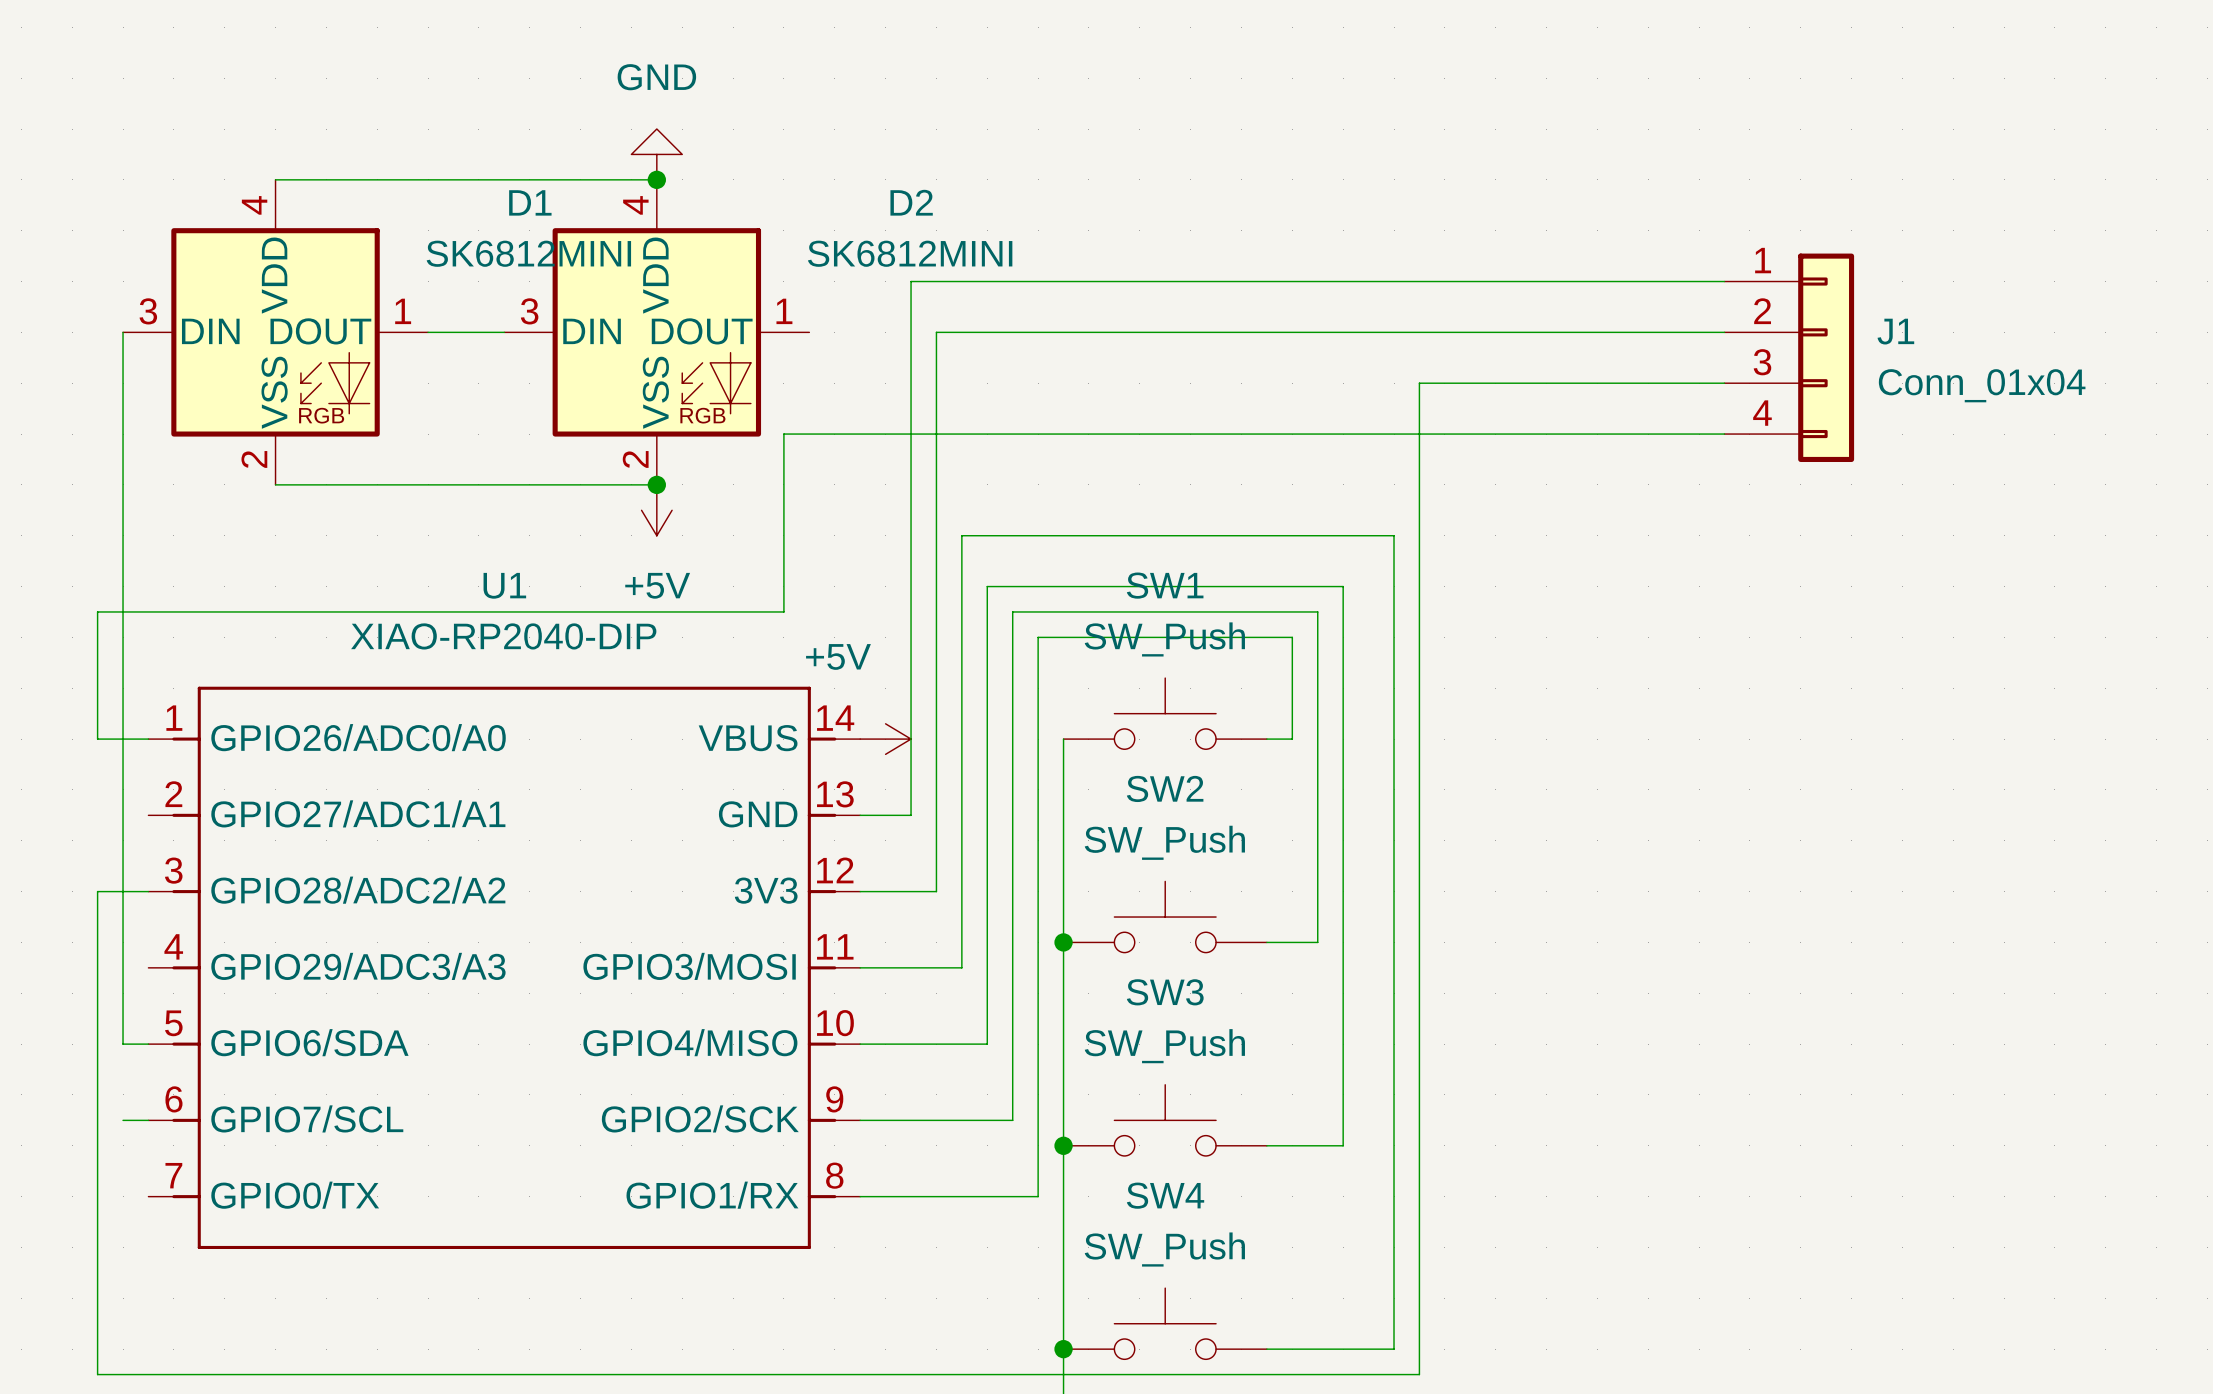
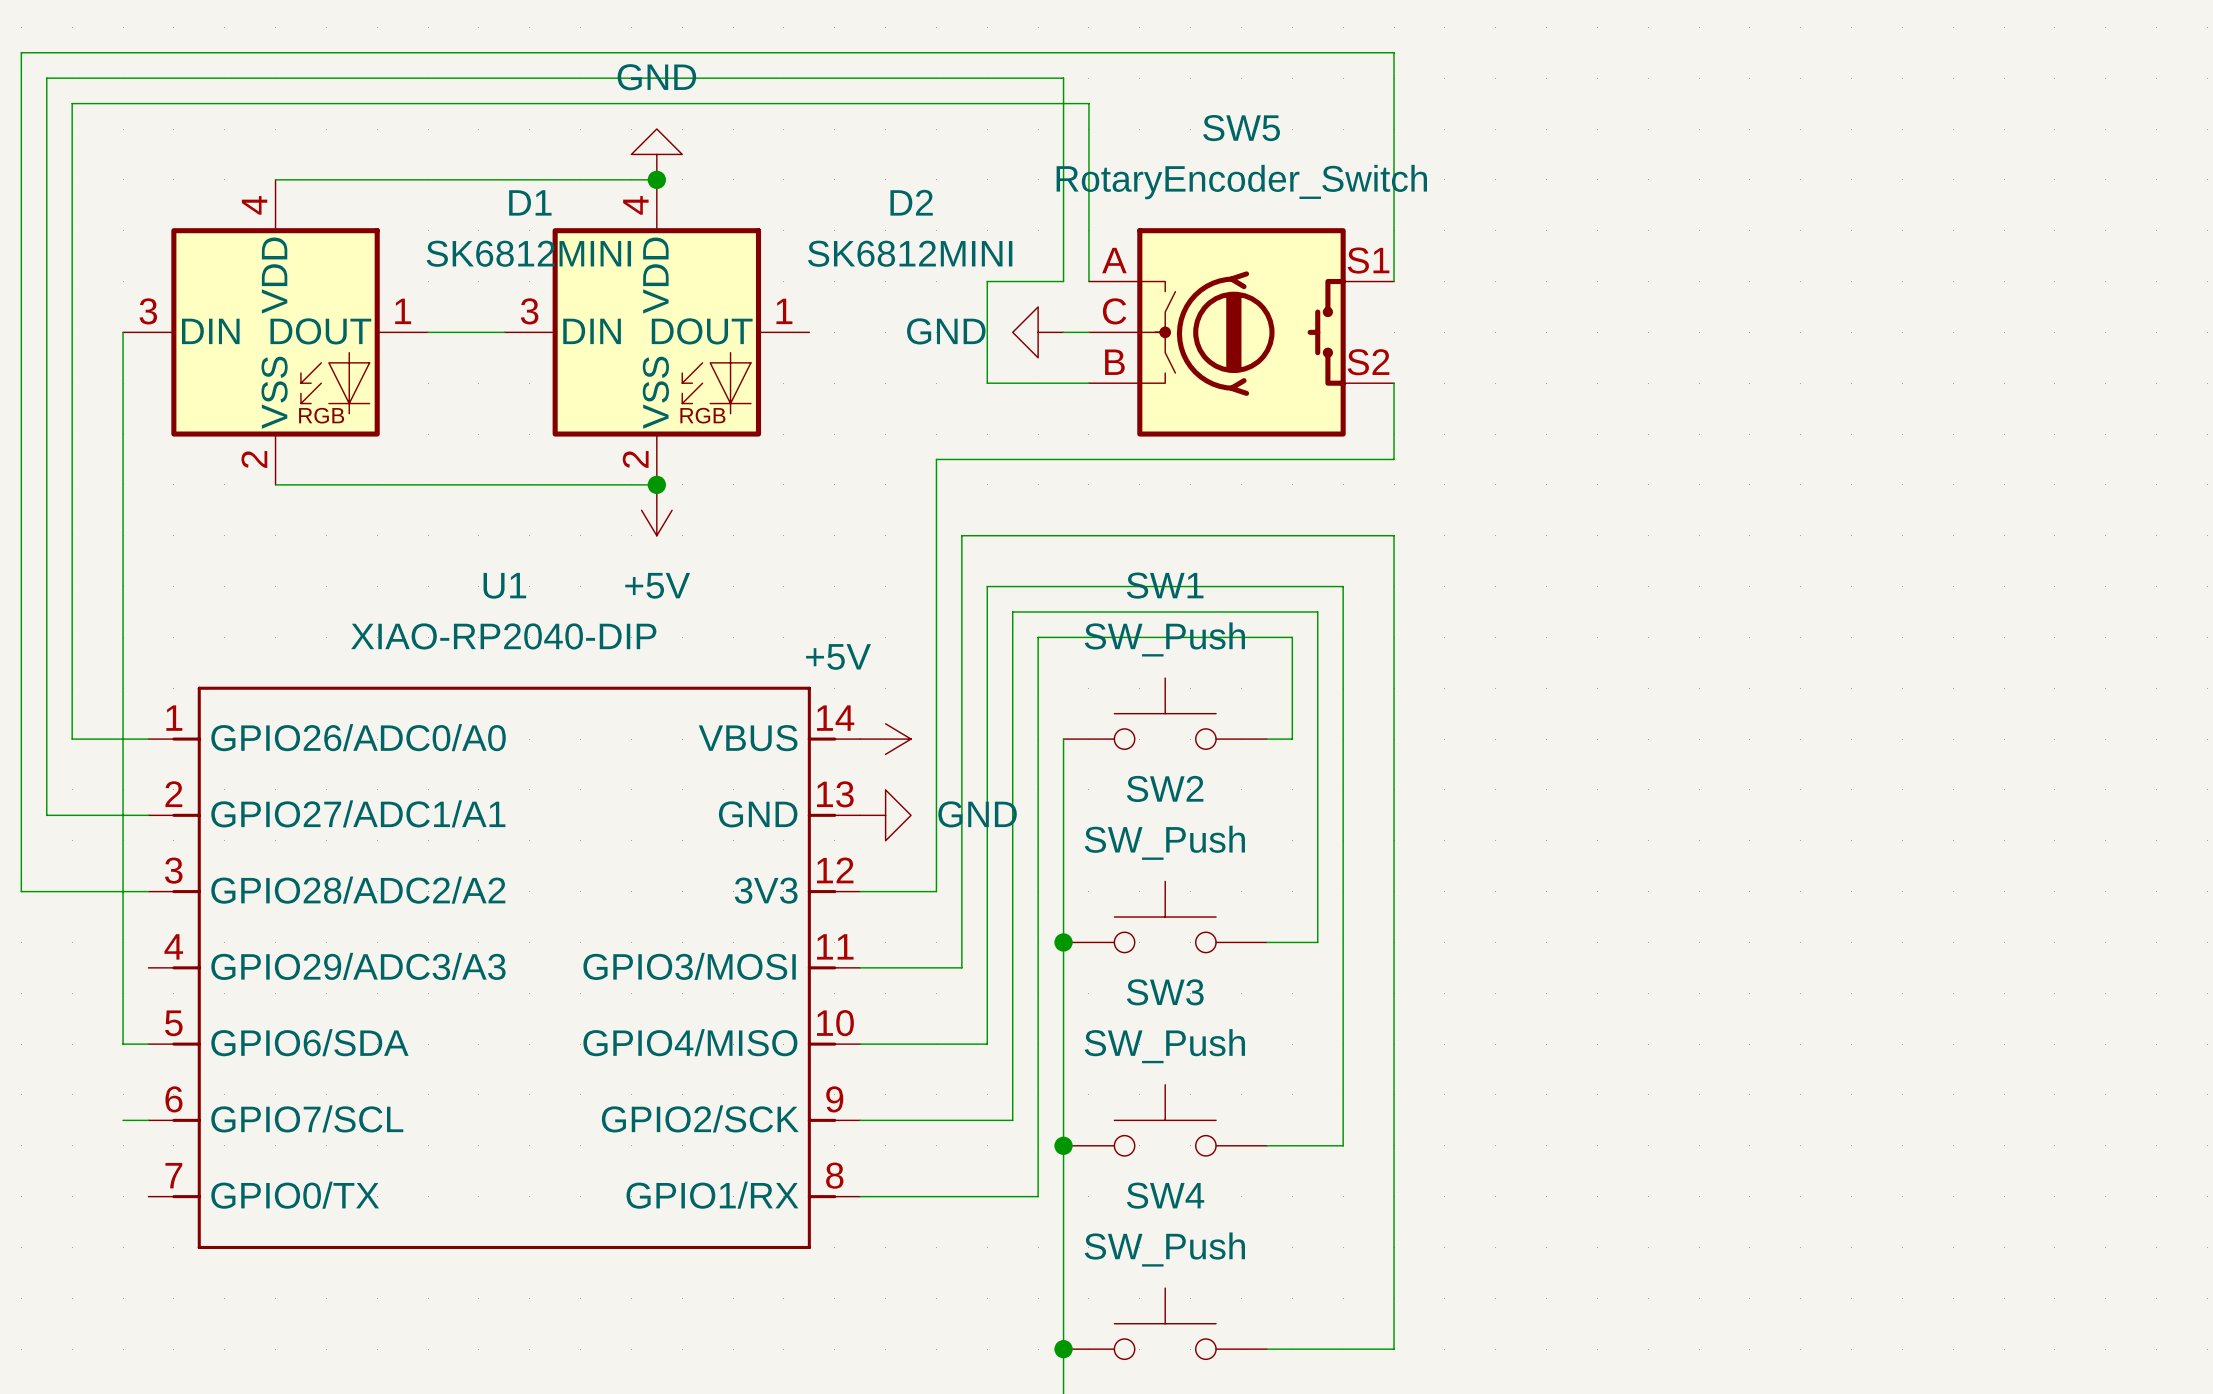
wire: (987, 281) (911, 281) (911, 815) (860, 815) -> (987, 281) (987, 383) (1088, 383)
wire: (1063, 281) (1724, 281) -> (1063, 281) (1063, 78) (46, 78) (46, 815) (148, 815)
power symbol: none -> GND (1038, 332)
wire: (1063, 332) (936, 332) (936, 459) -> (1394, 383) (1394, 459) (936, 459)
wire: (1088, 332) (1724, 332) -> none
SW5: none -> RotaryEncoder_Switch (1241, 332)
J1: Conn_01x04 (1789, 357) -> none
wire: (1724, 383) (1419, 383) (1419, 1374) (97, 1374) (97, 891) -> (1394, 281) (1394, 52) (21, 52) (21, 891) (97, 891)
wire: (1724, 434) (783, 434) (783, 611) (97, 611) (97, 739) -> (1088, 281) (1088, 103) (72, 103) (72, 739) (97, 739)
power symbol: none -> GND (885, 815)

